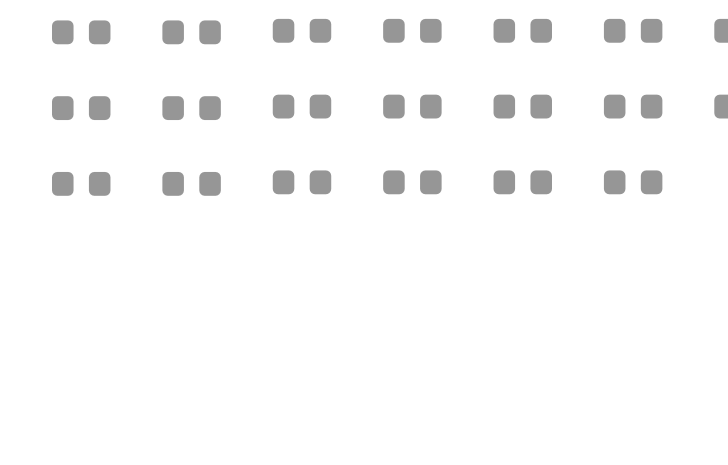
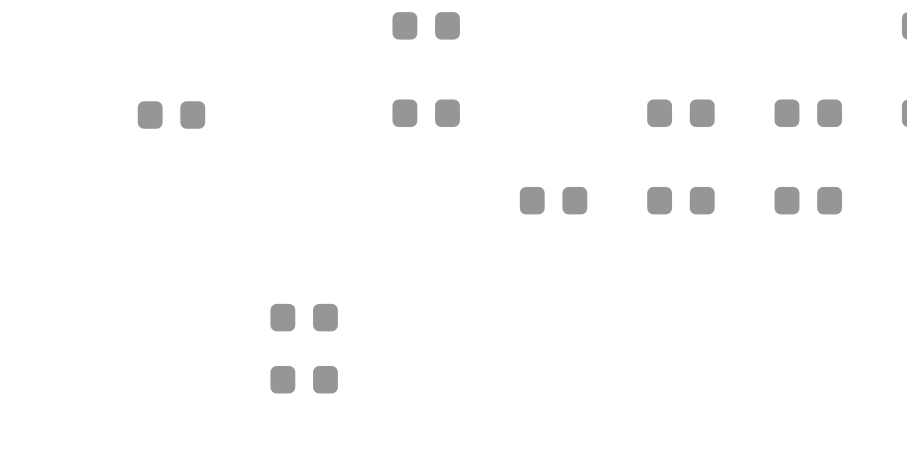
part: (412, 30) -> none
part: (522, 30) -> none
part: (633, 30) -> none
part: (81, 32) -> none
part: (191, 32) -> none
part: (412, 106) -> none
part: (191, 108) -> none
part: (301, 182) -> none
part: (81, 183) -> none
part: (191, 183) -> none
part: none -> (304, 317)
part: none -> (304, 379)

